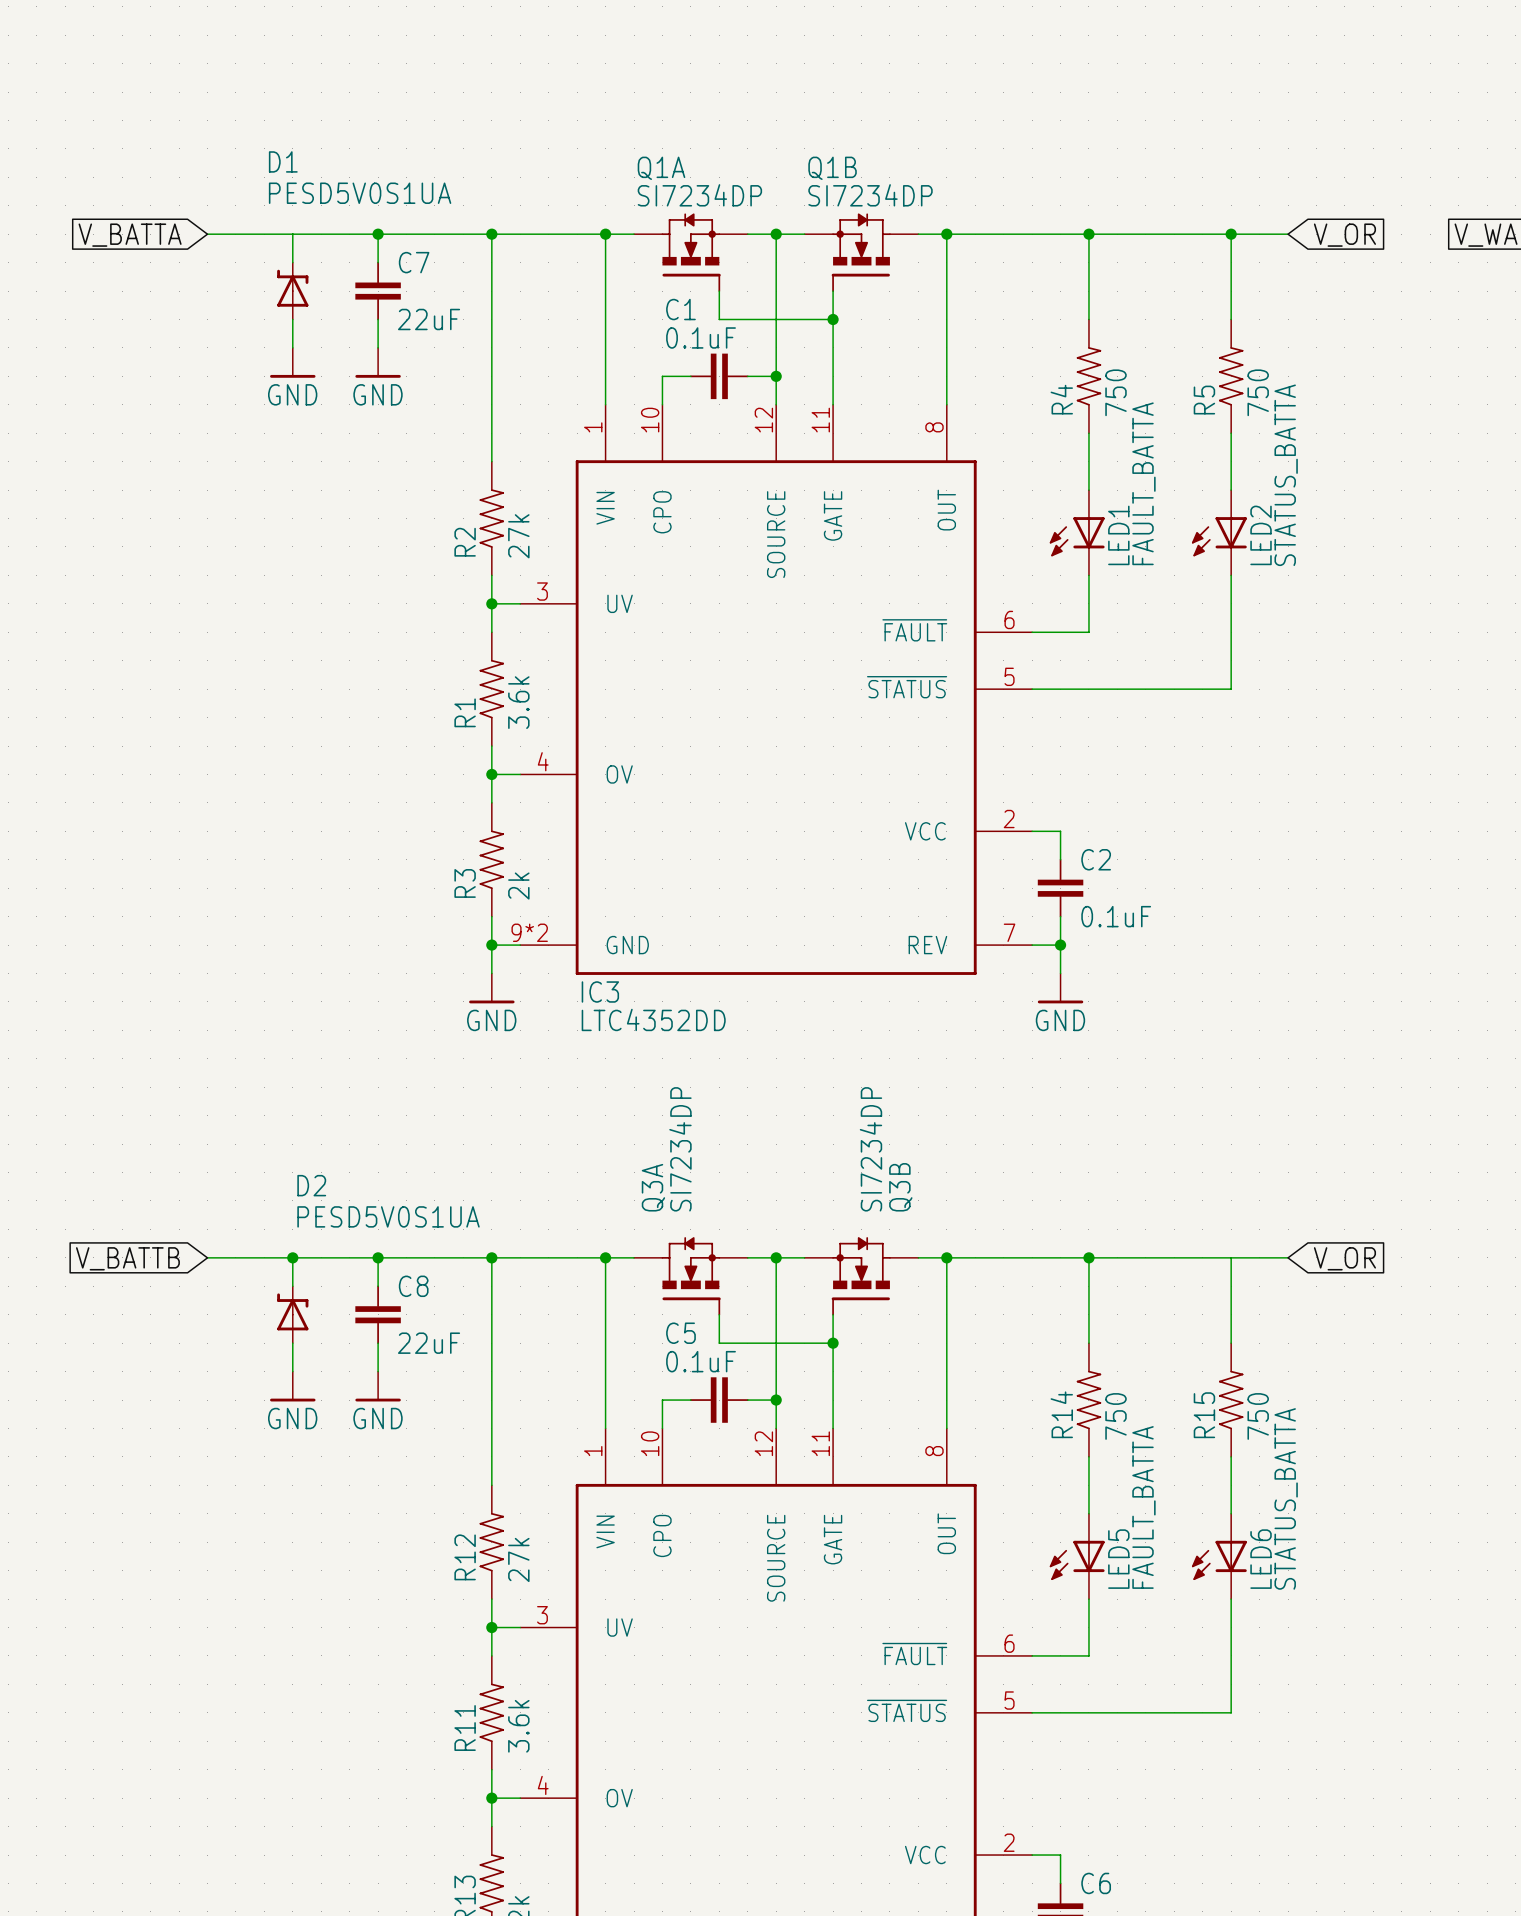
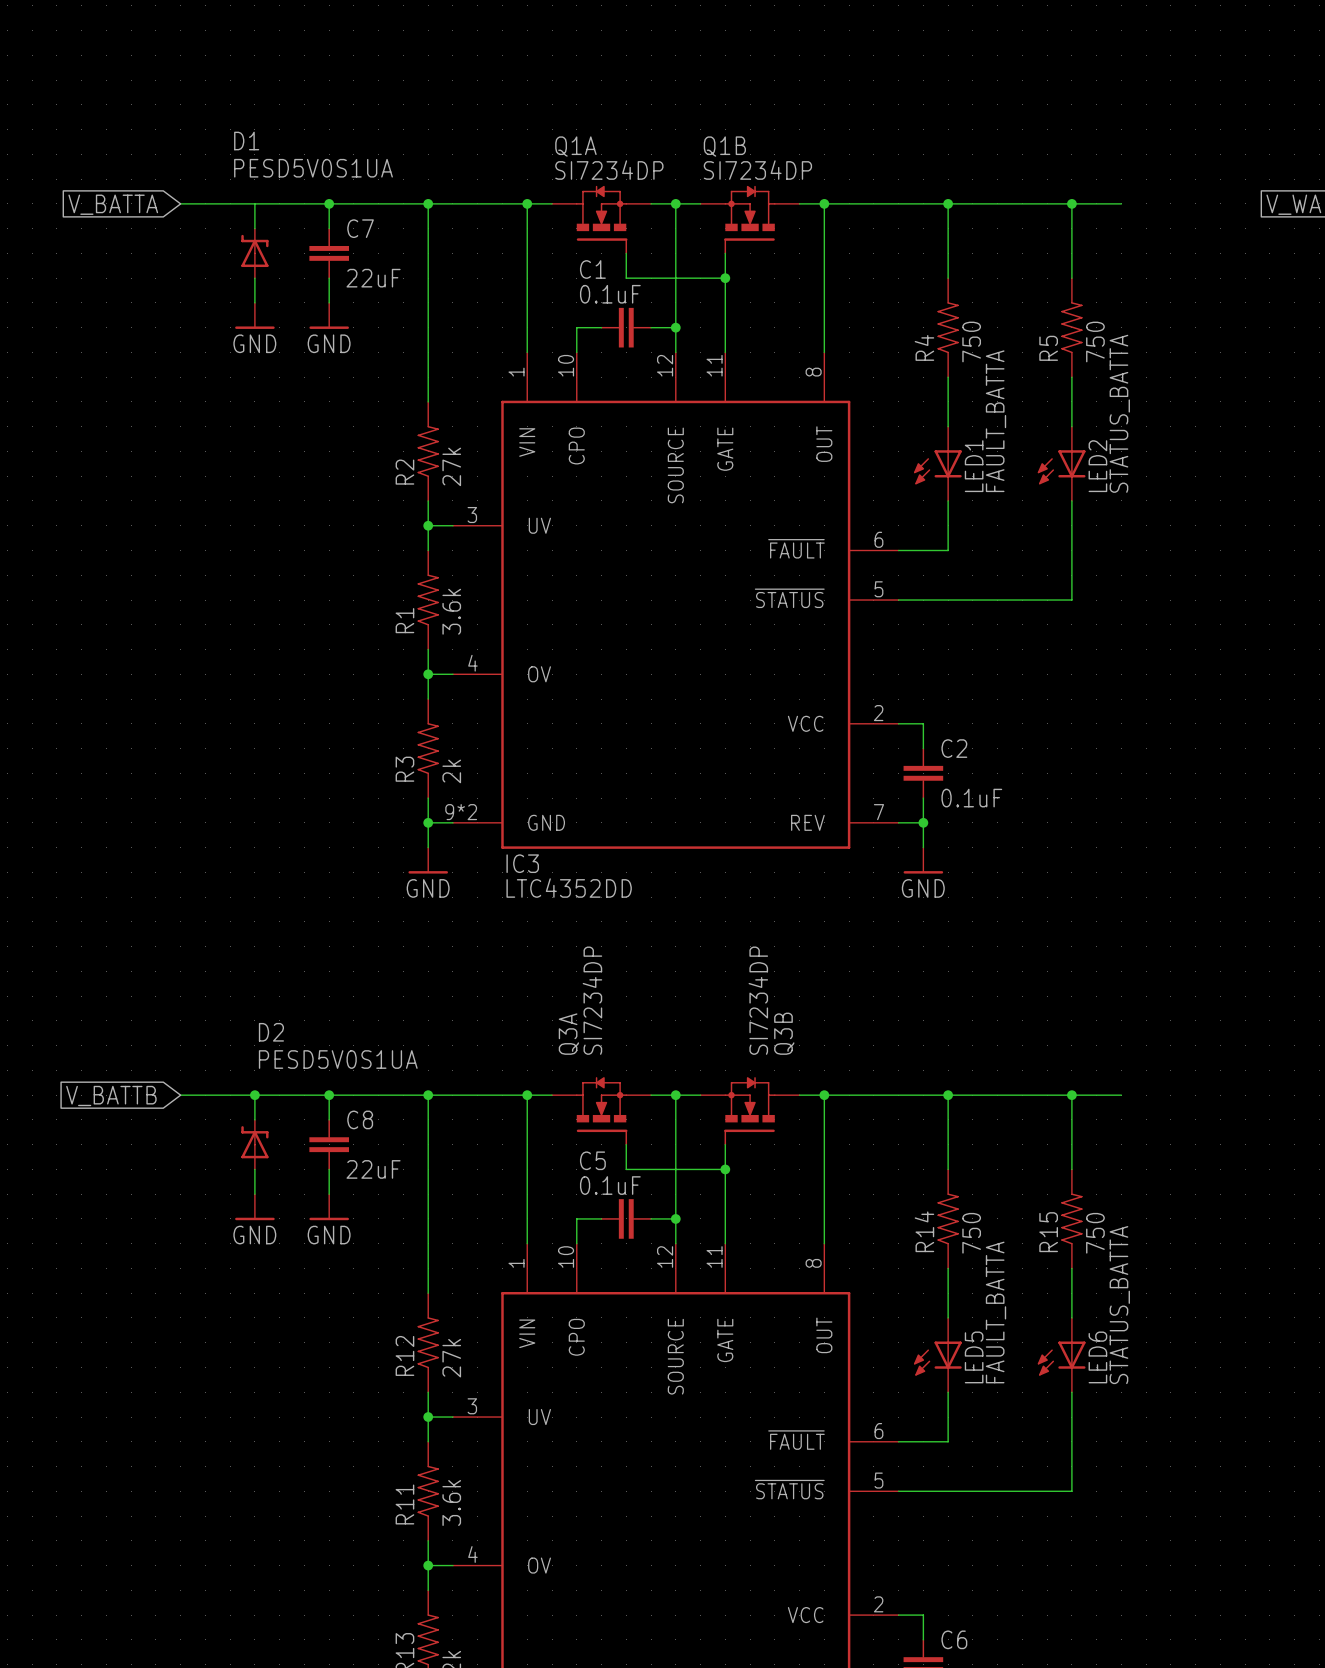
global label: V_OR (1344, 235) -> none
junction: none -> (1071, 1095)
global label: V_OR (1344, 1258) -> none

